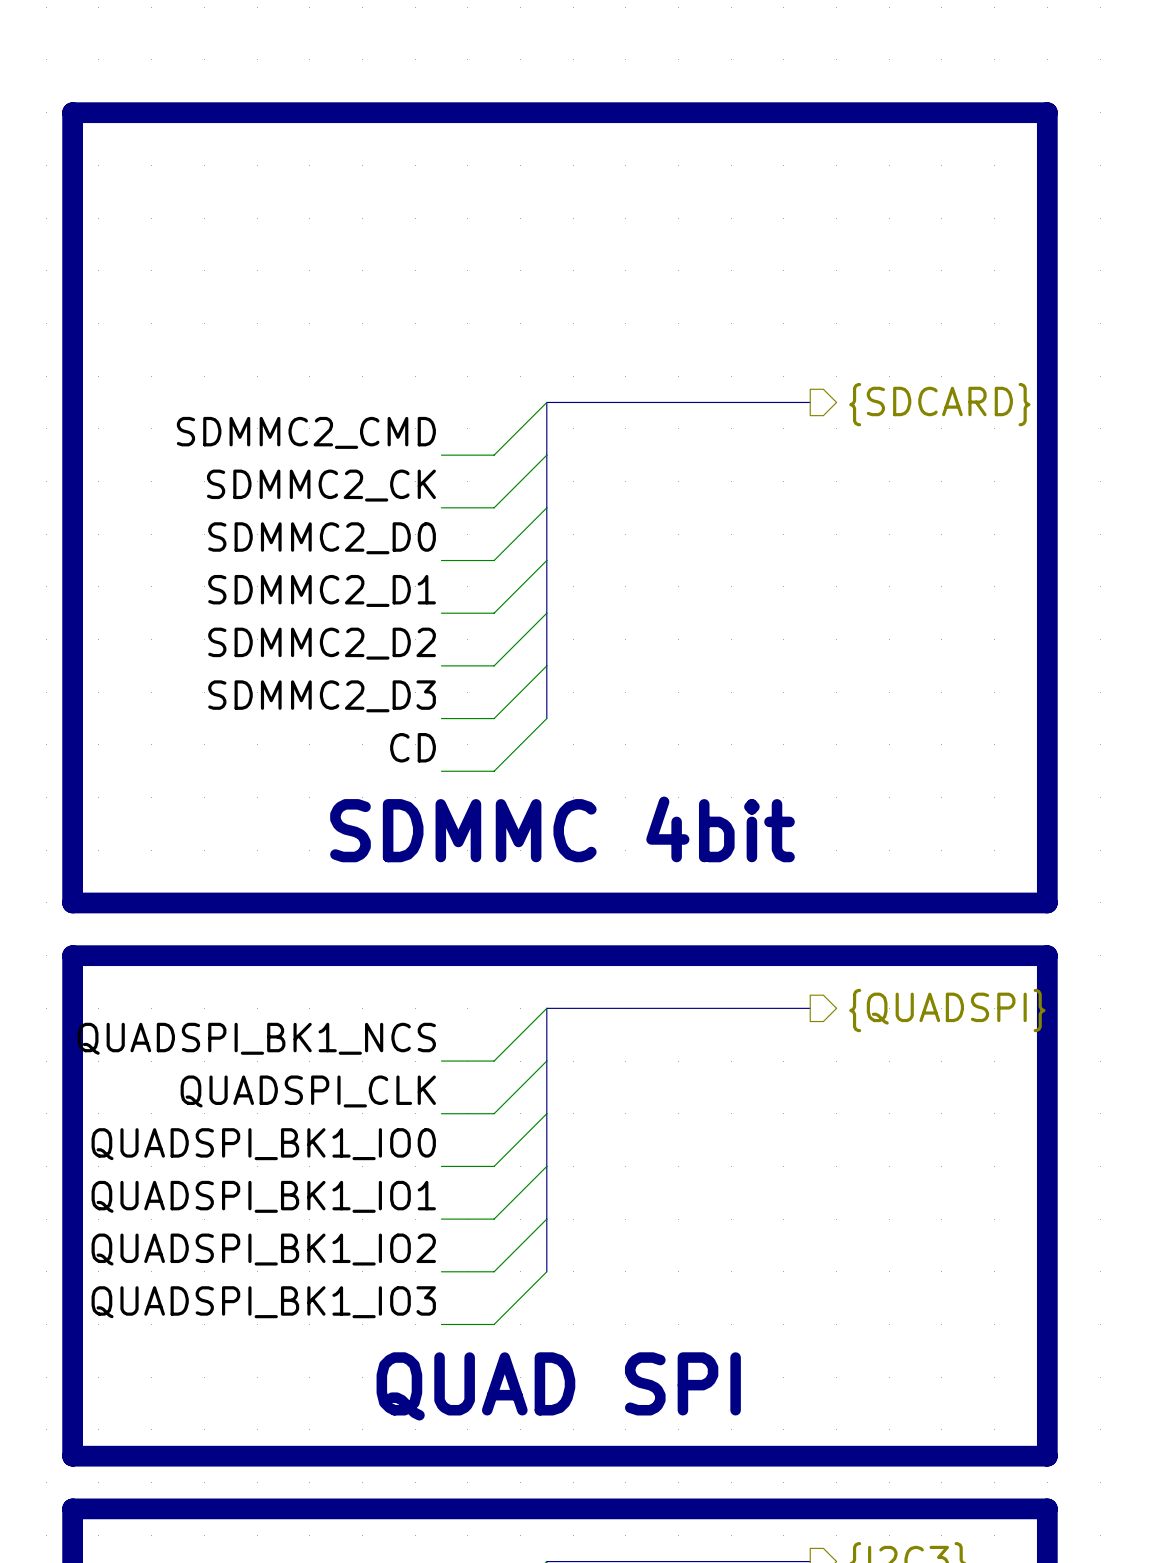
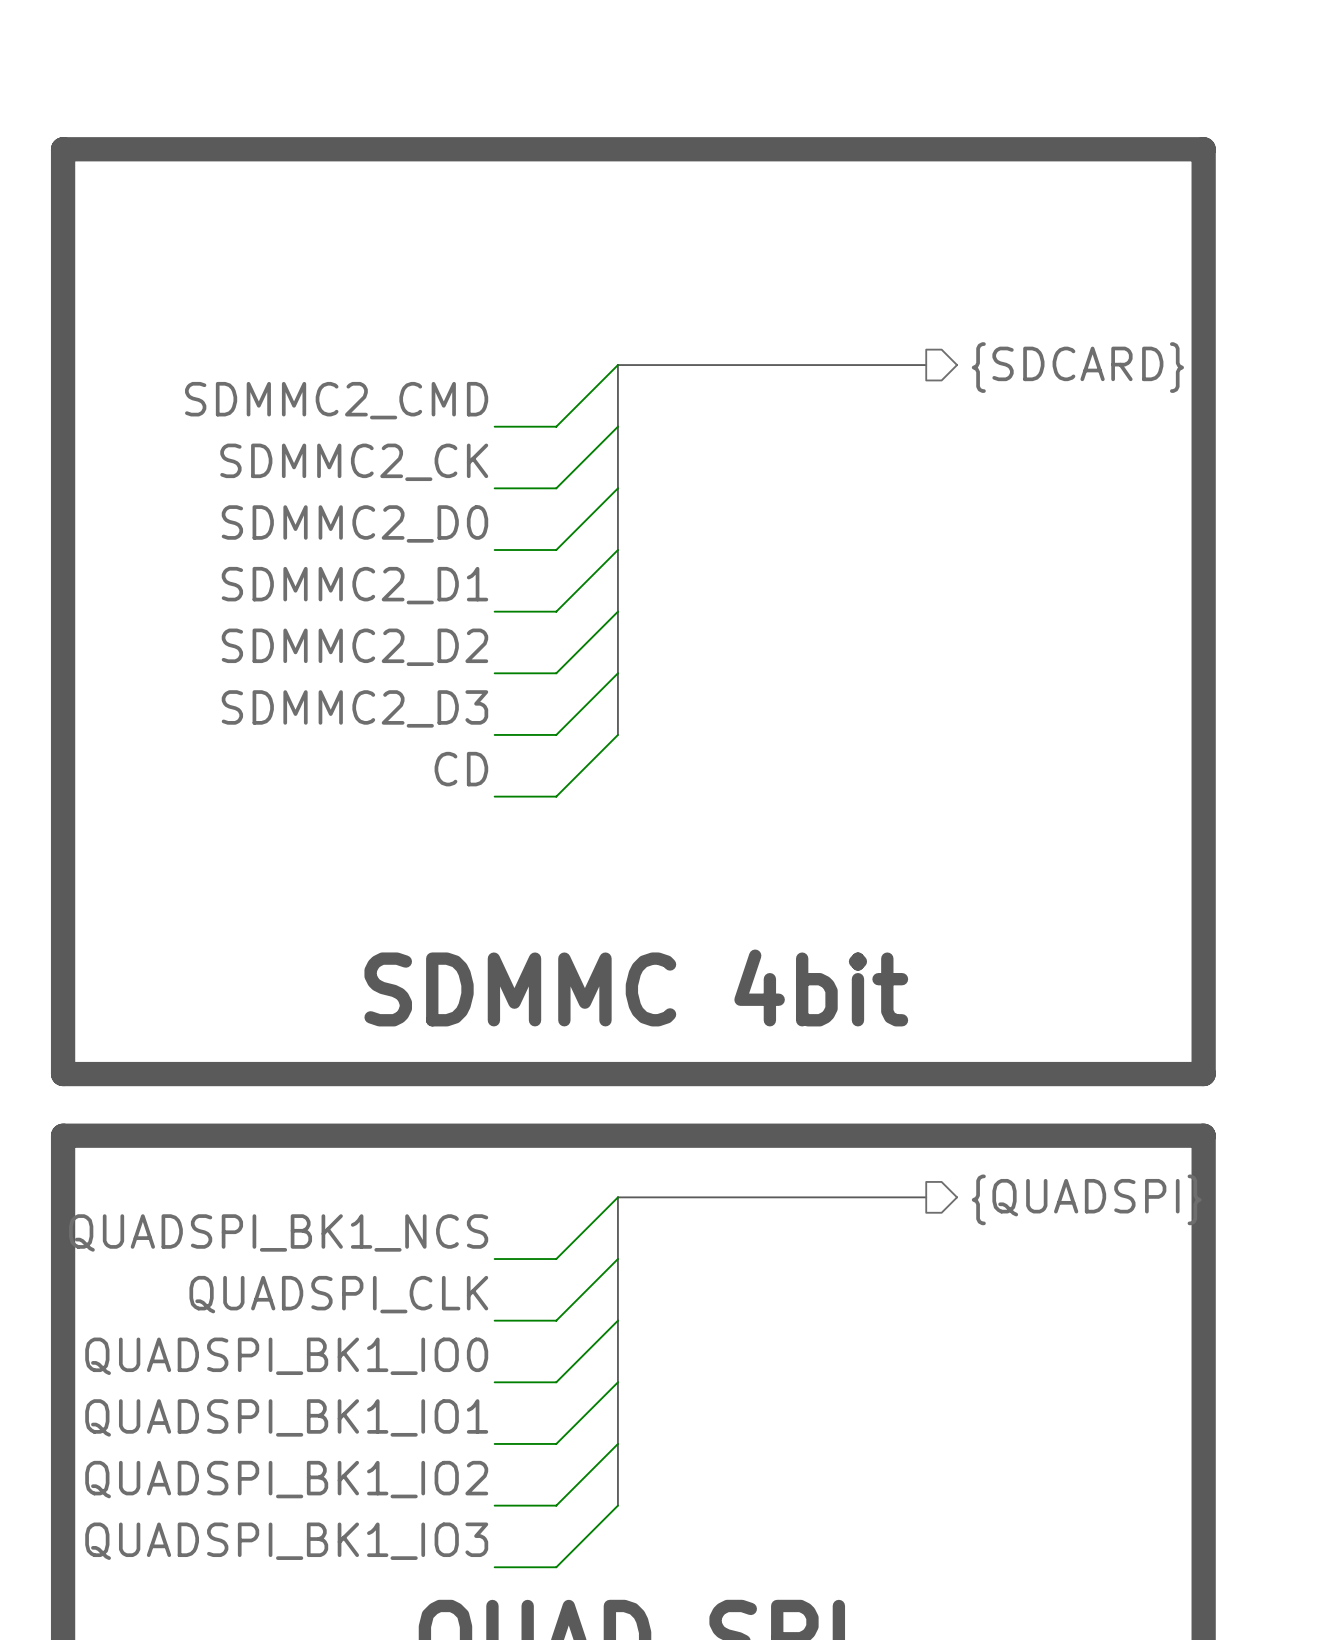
label: none -> SDMMC2_CMD (336, 400)
label: none -> SDMMC2_CK (354, 462)
bus: (546, 402) (810, 402) -> (617, 488) (617, 365) (926, 365)
hierarchical label position: {SDCARD} (939, 404) -> {SDCARD} (1077, 367)
label: SDMMC2_CMD (306, 432) -> SDMMC2_D0 (354, 523)
label: SDMMC2_CK (321, 485) -> SDMMC2_D1 (354, 585)
label: SDMMC2_D0 (322, 538) -> SDMMC2_D2 (354, 647)
label: SDMMC2_D1 (322, 590) -> SDMMC2_D3 (354, 708)
bus: (546, 613) (546, 718) -> none
label: SDMMC2_D2 (322, 643) -> CD (461, 769)
wire: (546, 665) (494, 718) (441, 718) -> (617, 365) (556, 426) (494, 426)
label: SDMMC2_D3 (322, 696) -> none
wire: (546, 718) (494, 771) (441, 771) -> (617, 426) (556, 488) (494, 488)
label: CD (413, 747) -> none

